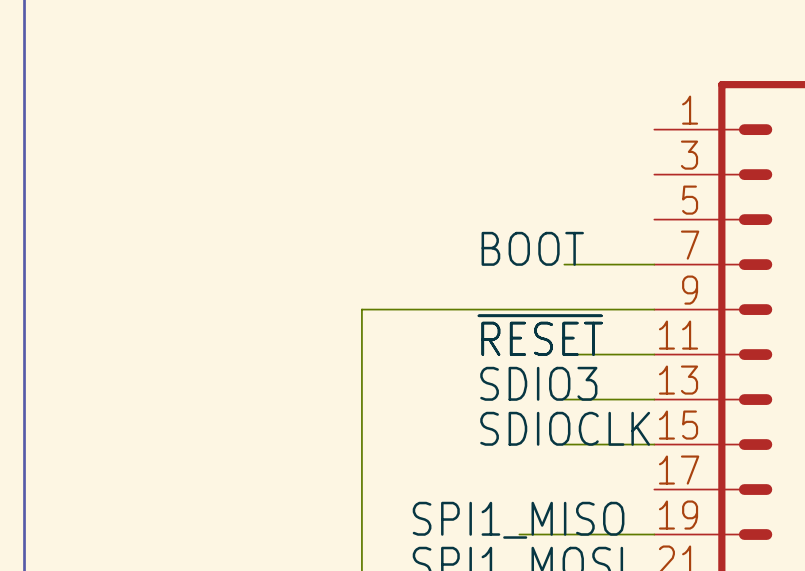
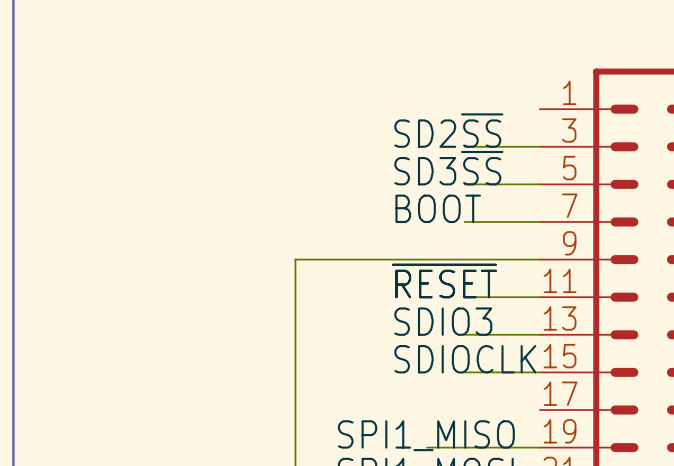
label: none -> SD2~{SS} (448, 130)
wire: none -> (464, 146) (539, 146)
label: none -> SD3~{SS} (448, 168)
wire: none -> (464, 184) (539, 184)

